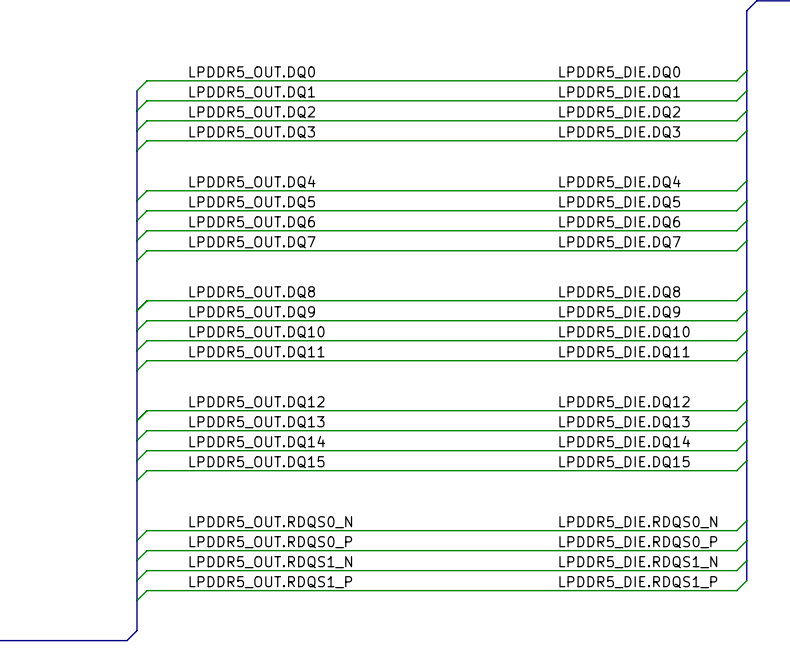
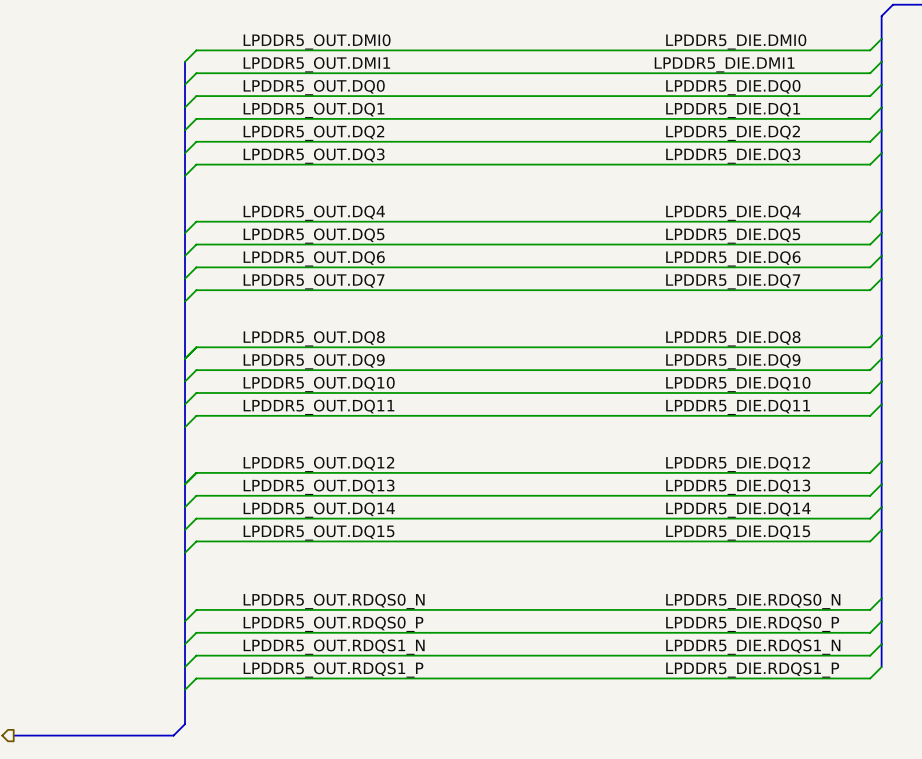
wire: none -> (881, 38) (870, 50) (196, 50) (185, 61)
label: none -> LPDDR5_OUT.DMI0 (317, 41)
label: none -> LPDDR5_DIE.DMI0 (736, 41)
bus: none -> (185, 61) (185, 107)
wire: none -> (881, 61) (870, 73) (196, 73) (185, 84)
label: none -> LPDDR5_OUT.DMI1 (316, 64)
label: none -> LPDDR5_DIE.DMI1 (724, 64)

